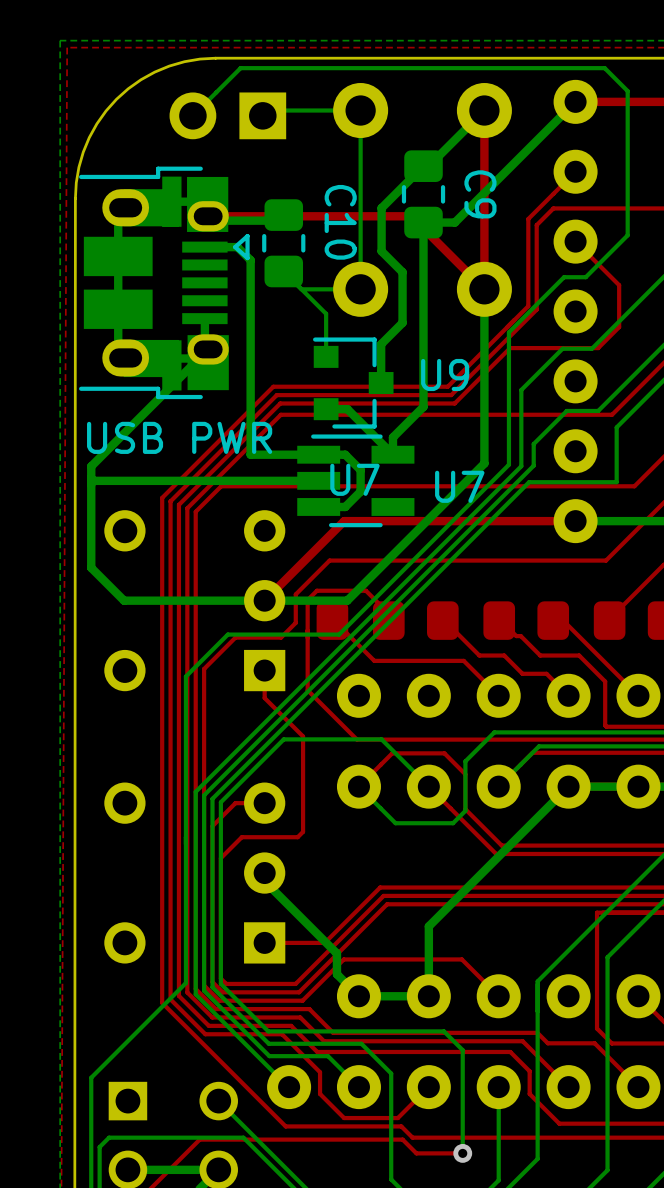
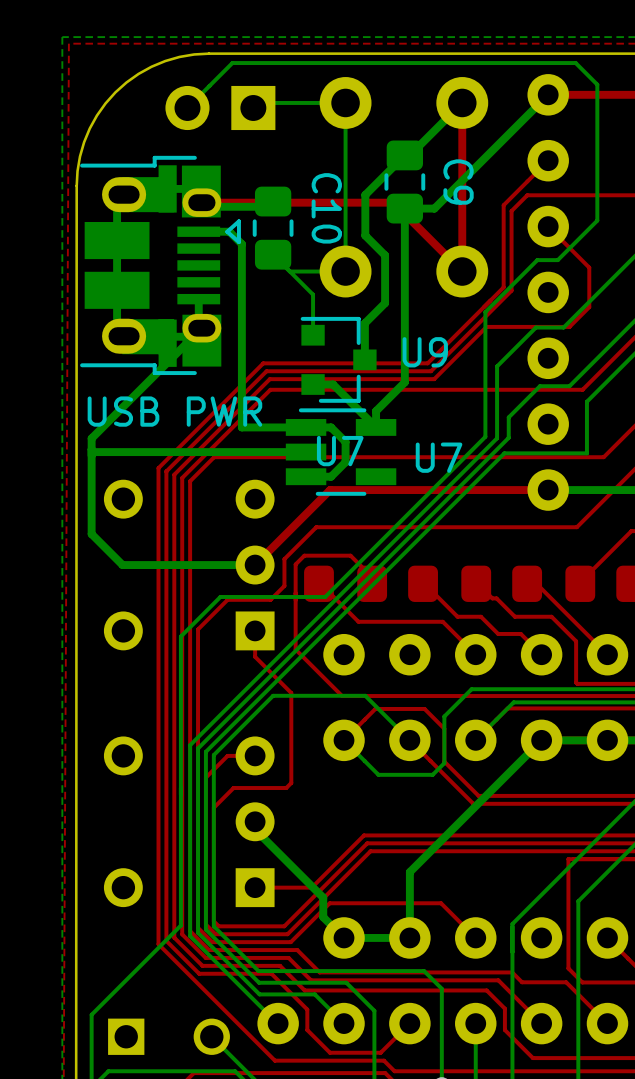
bottom track: (484, 289) (484, 463) (347, 600) (264, 600) -> none

